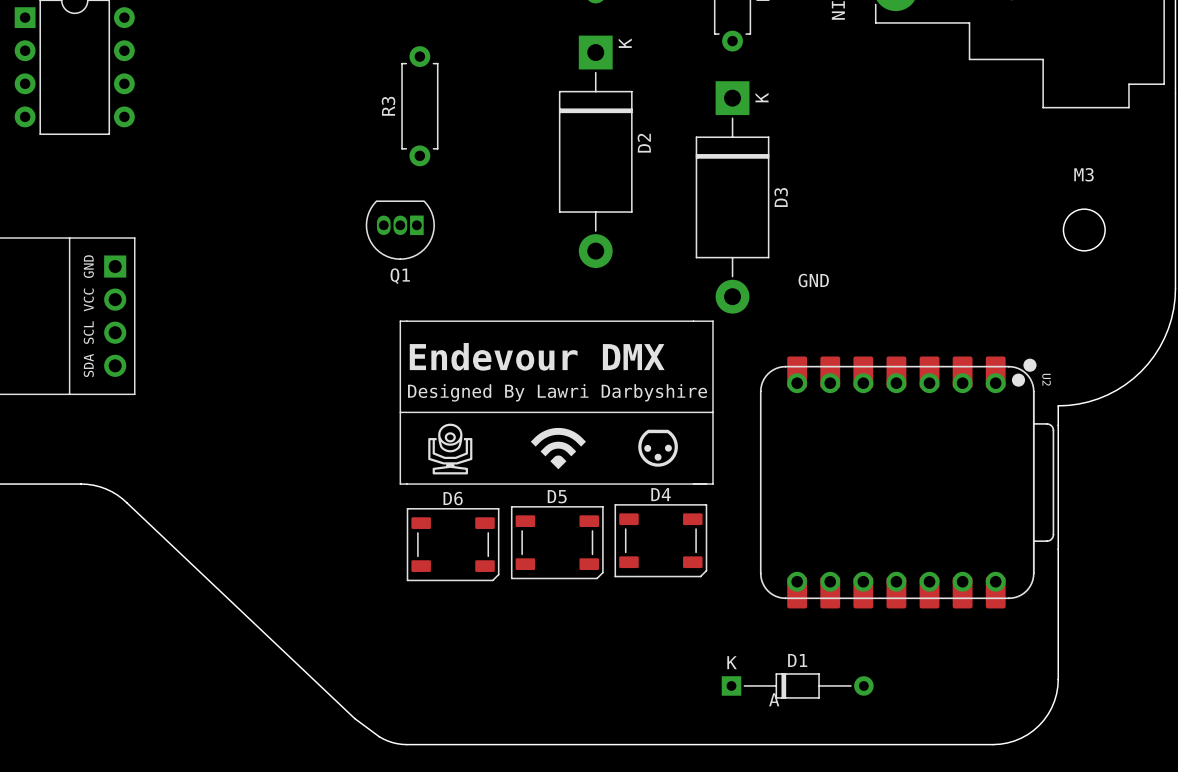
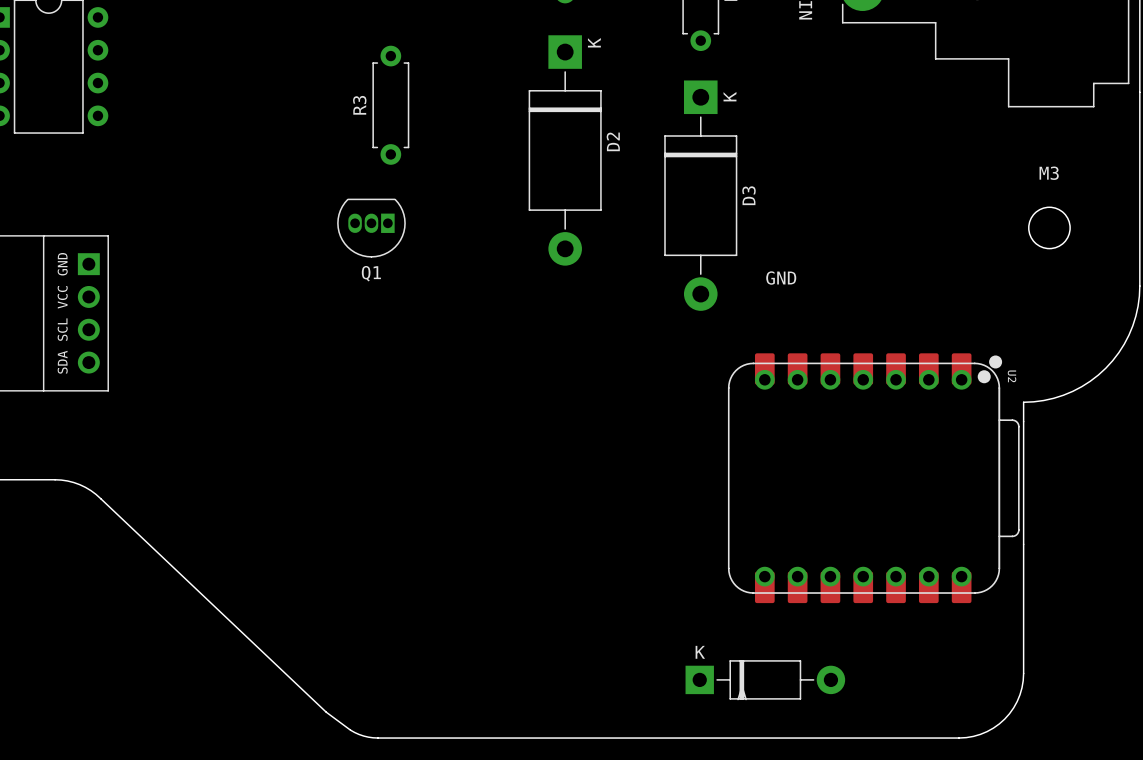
line: (400, 321) (713, 321) (713, 484) (400, 484) (400, 321) -> none
text: Endevour DMX (537, 356) -> none
text: Designed By Lawri Darbyshire (557, 392) -> none
line: (400, 412) (713, 412) -> none
drawing: [428, 423, 473, 475] -> none
drawing: [530, 427, 586, 470] -> none
drawing: [638, 429, 678, 467] -> none
D4: (660, 540) -> none
D5: (557, 542) -> none
D6: (453, 544) -> none
D1: (797, 685) -> none
part: none -> (765, 679)

